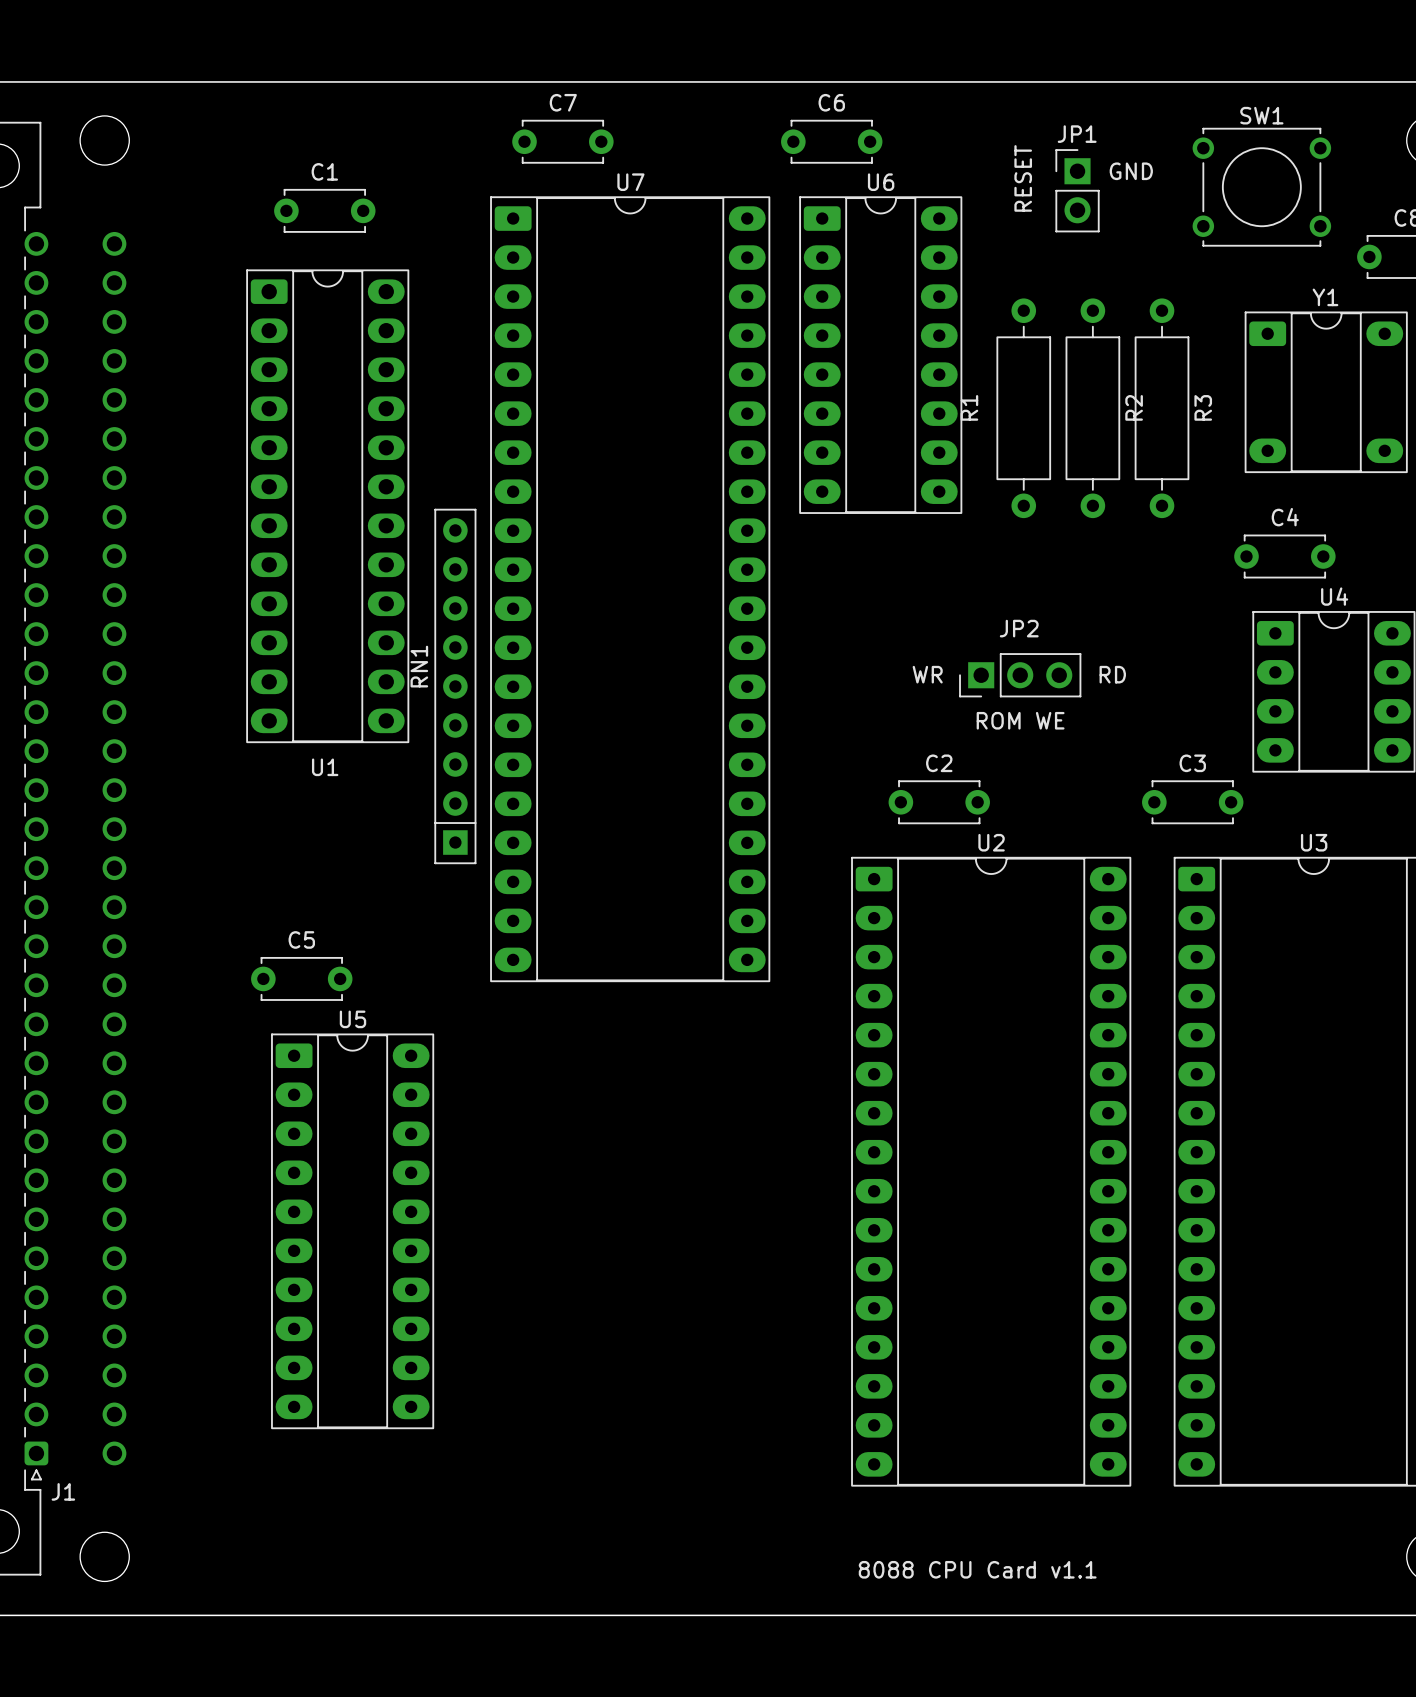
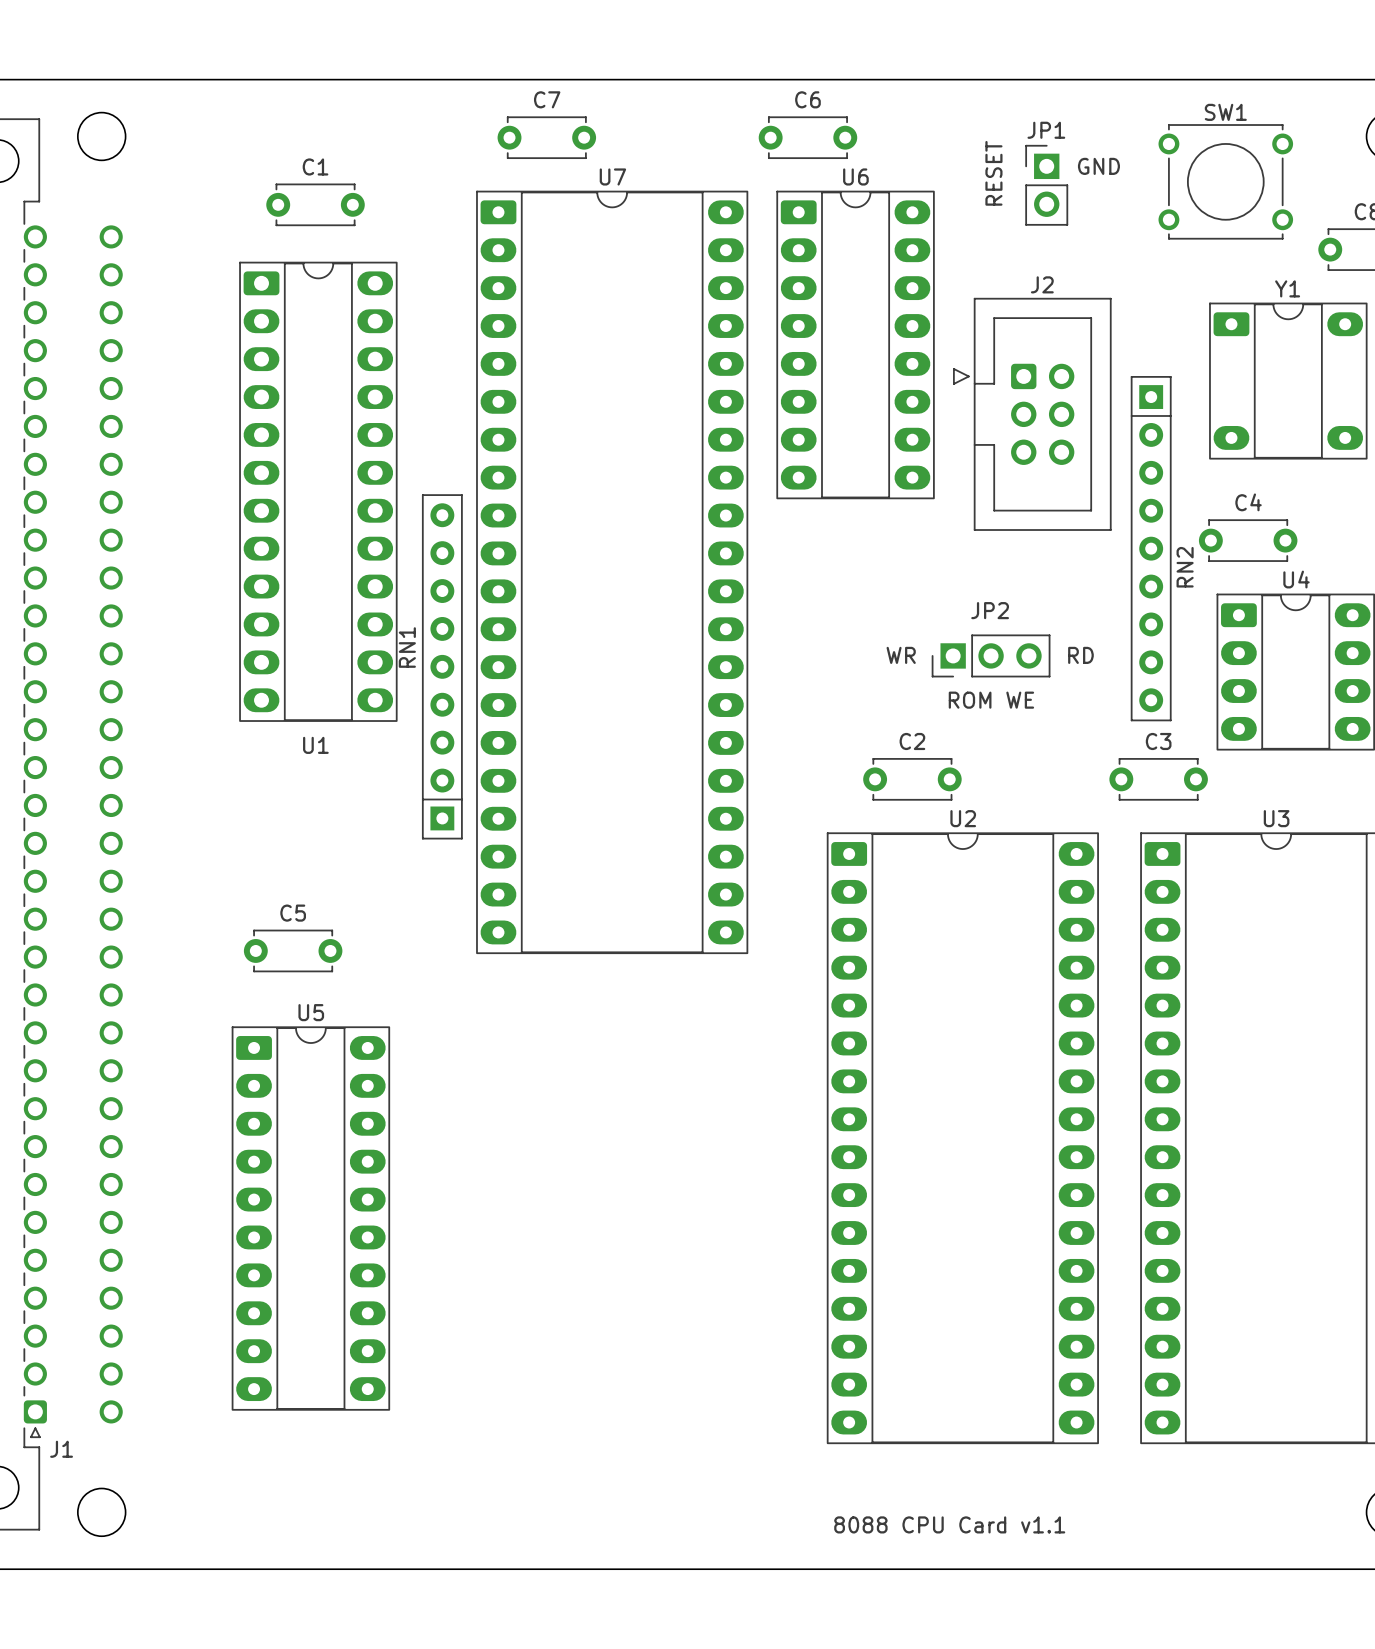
R1: (1023, 408) -> none
R2: (1092, 408) -> none
R3: (1162, 408) -> none
J2: none -> (1032, 414)
RN2: none -> (1151, 548)
U5 position: (352, 1231) -> (310, 1218)

